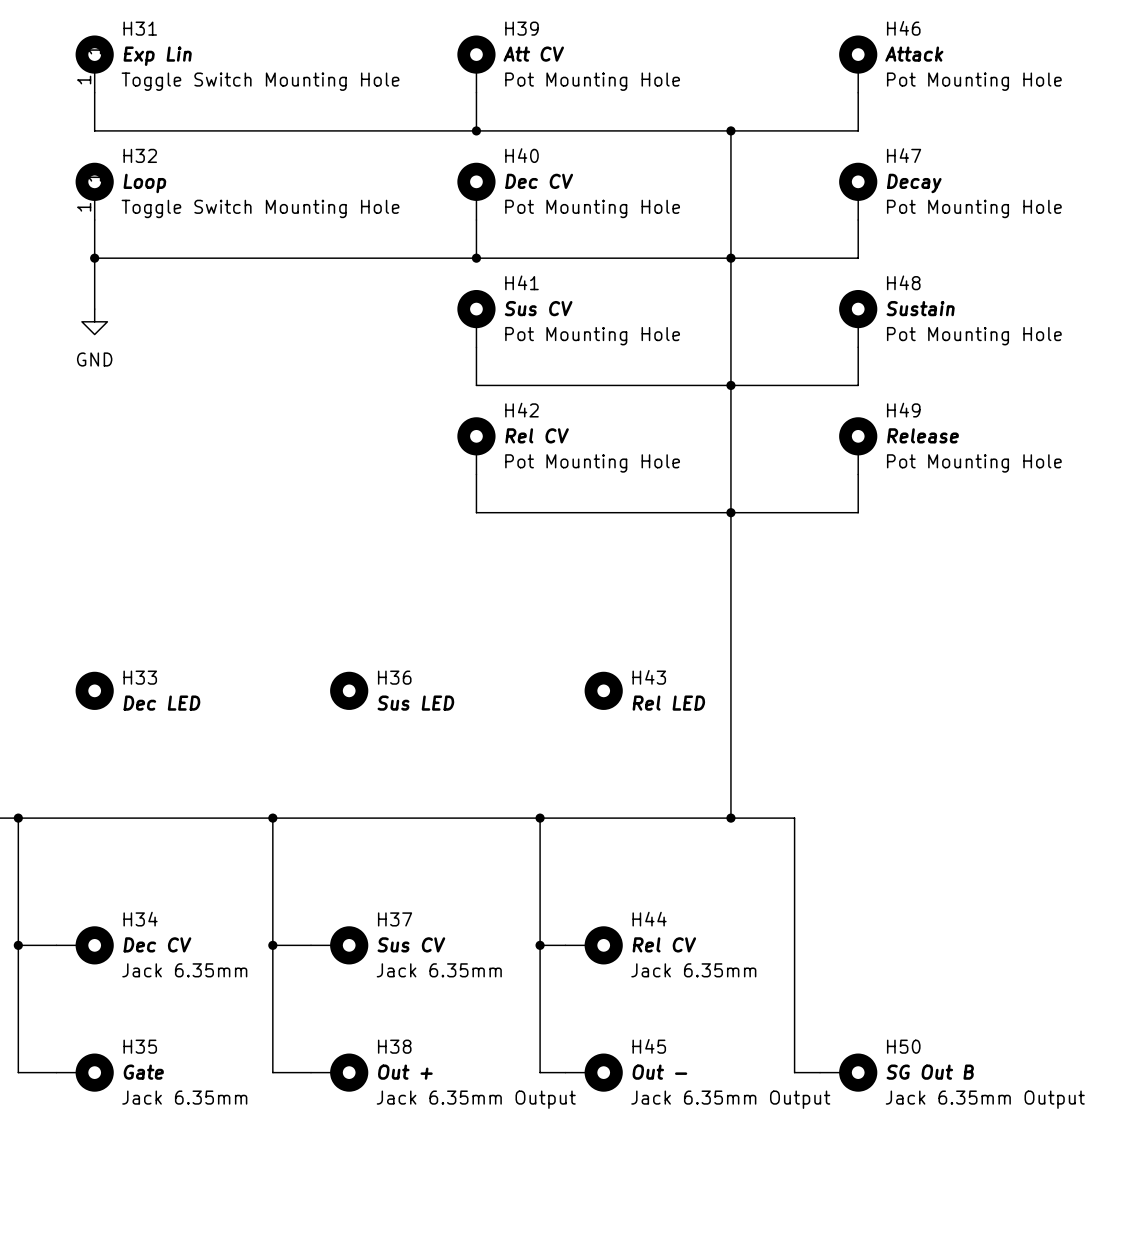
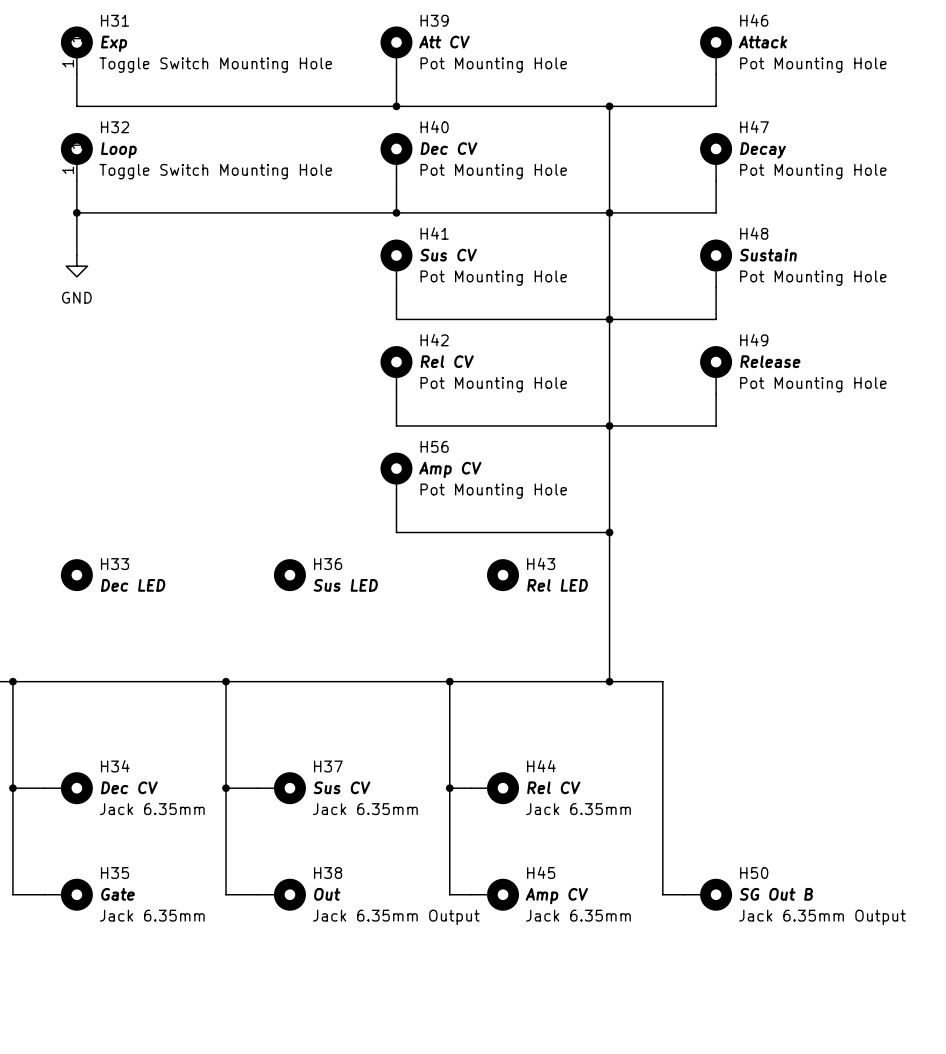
H31 value: Exp Lin (157, 56) -> Exp (114, 43)
H56: none -> Amp CV (396, 476)
wire: none -> (396, 500) (396, 532) (609, 532)
junction: none -> (609, 532)
H38 value: Out + (405, 1072) -> Out (327, 894)
H45 value: Out - (659, 1072) -> Amp CV (556, 896)
H45 text: Jack 6.35mm Output (730, 1099) -> Jack 6.35mm (578, 915)

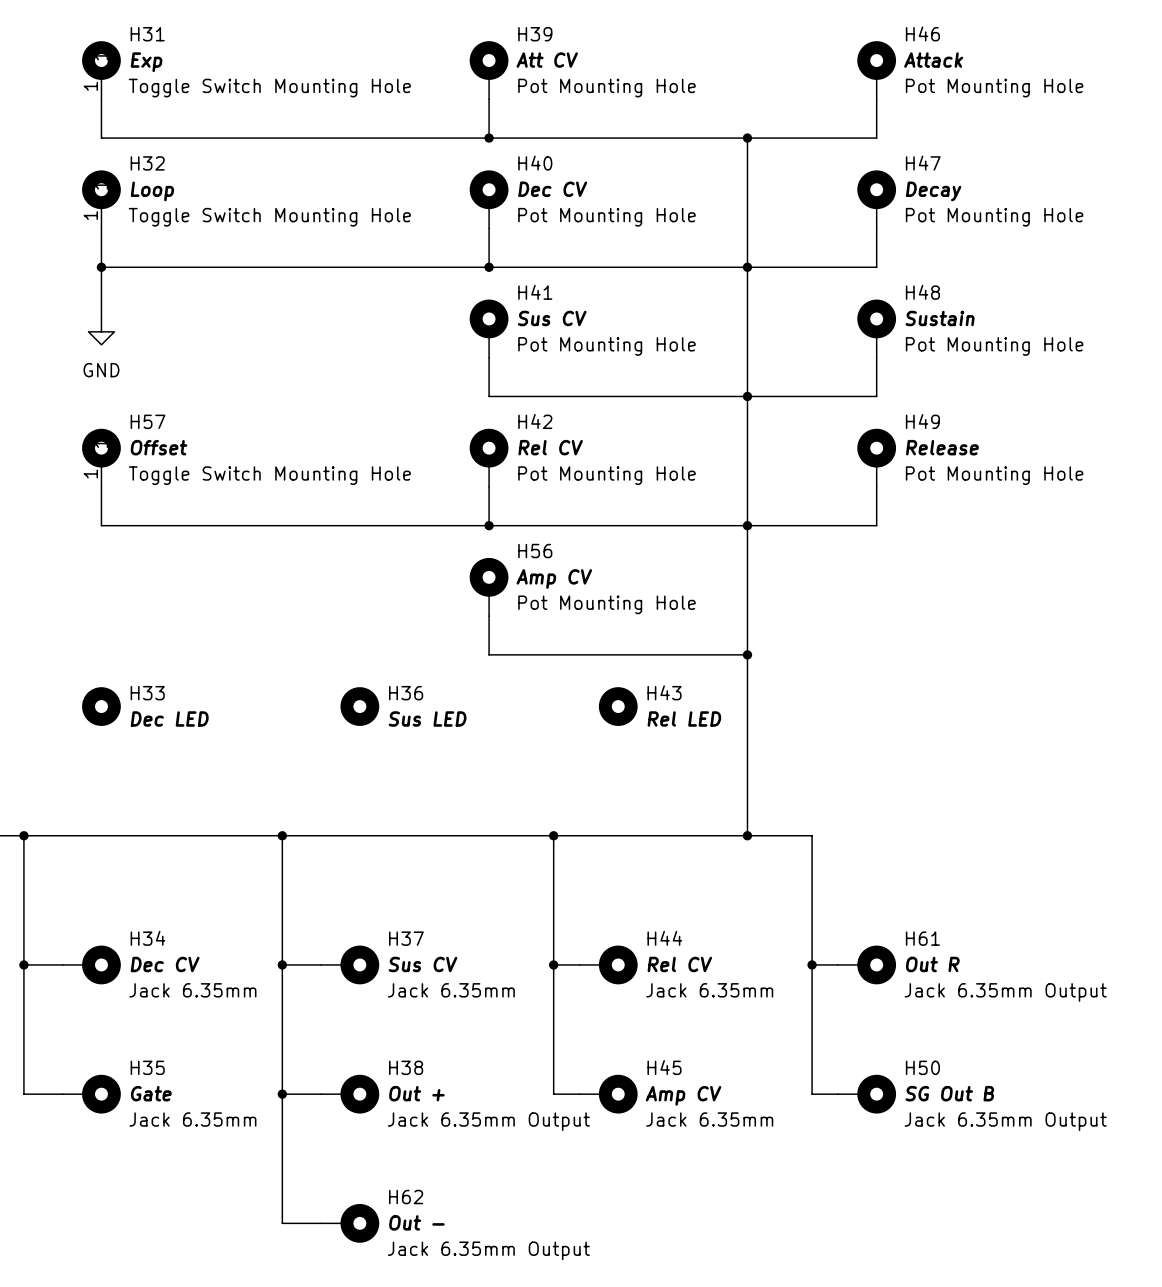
H57: none -> Offset (101, 457)
wire: none -> (101, 486) (101, 525) (489, 525)
junction: none -> (489, 525)
wire: none -> (812, 964) (837, 964)
junction: none -> (812, 964)
H61: none -> Out R (866, 964)
wire: none -> (282, 1094) (282, 1223) (321, 1223)
junction: none -> (282, 1094)
H38 value: Out (327, 894) -> Out + (416, 1093)
H62: none -> Out - (350, 1223)

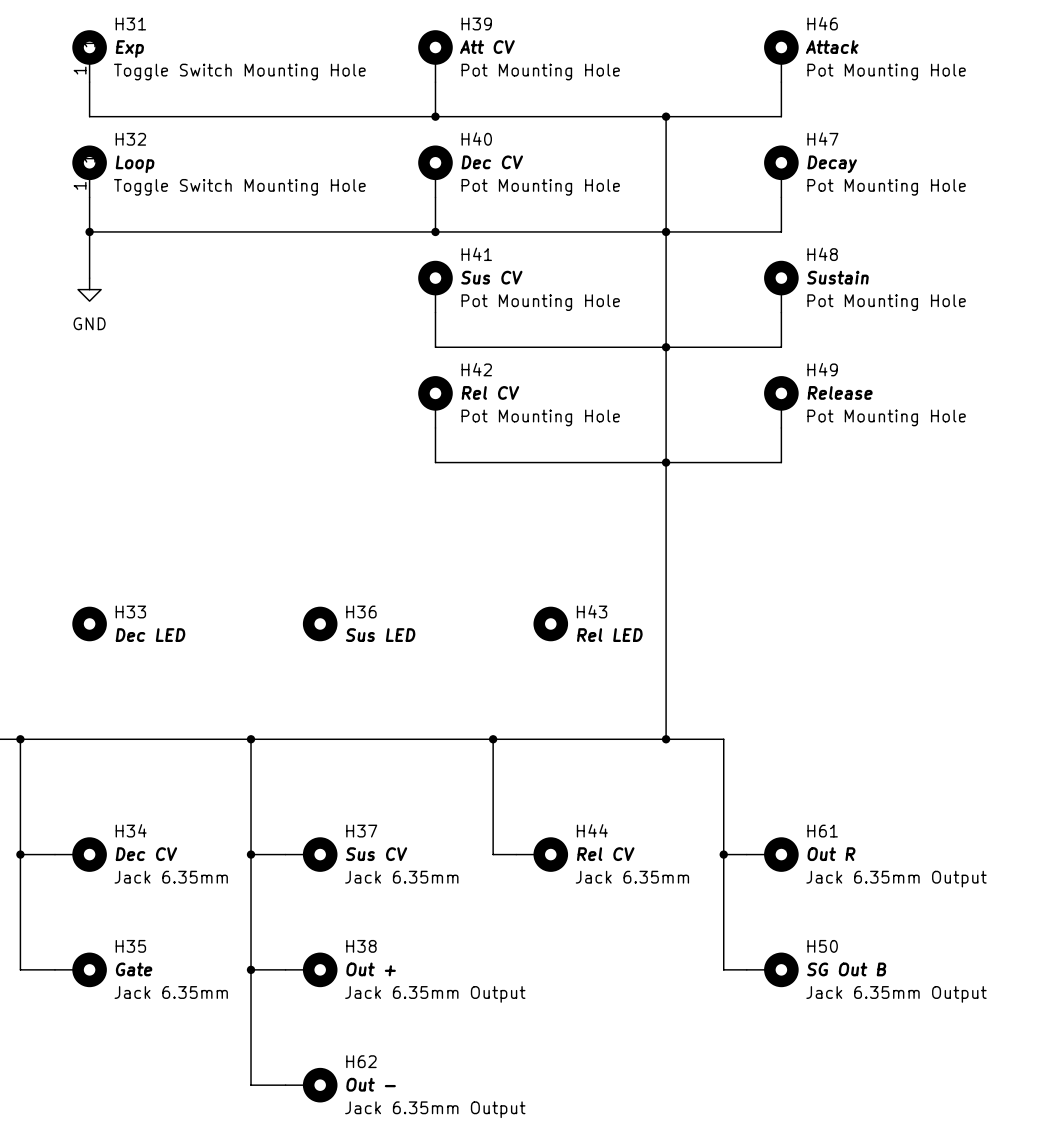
H57: Offset (101, 457) -> none
wire: (101, 486) (101, 525) (489, 525) -> none
junction: (489, 525) -> none
H56: Amp CV (489, 587) -> none
wire: (489, 616) (489, 654) (747, 654) -> none
junction: (747, 654) -> none
wire: (553, 964) (553, 1094) (579, 1094) -> none
junction: (553, 964) -> none
H45: Amp CV (608, 1094) -> none

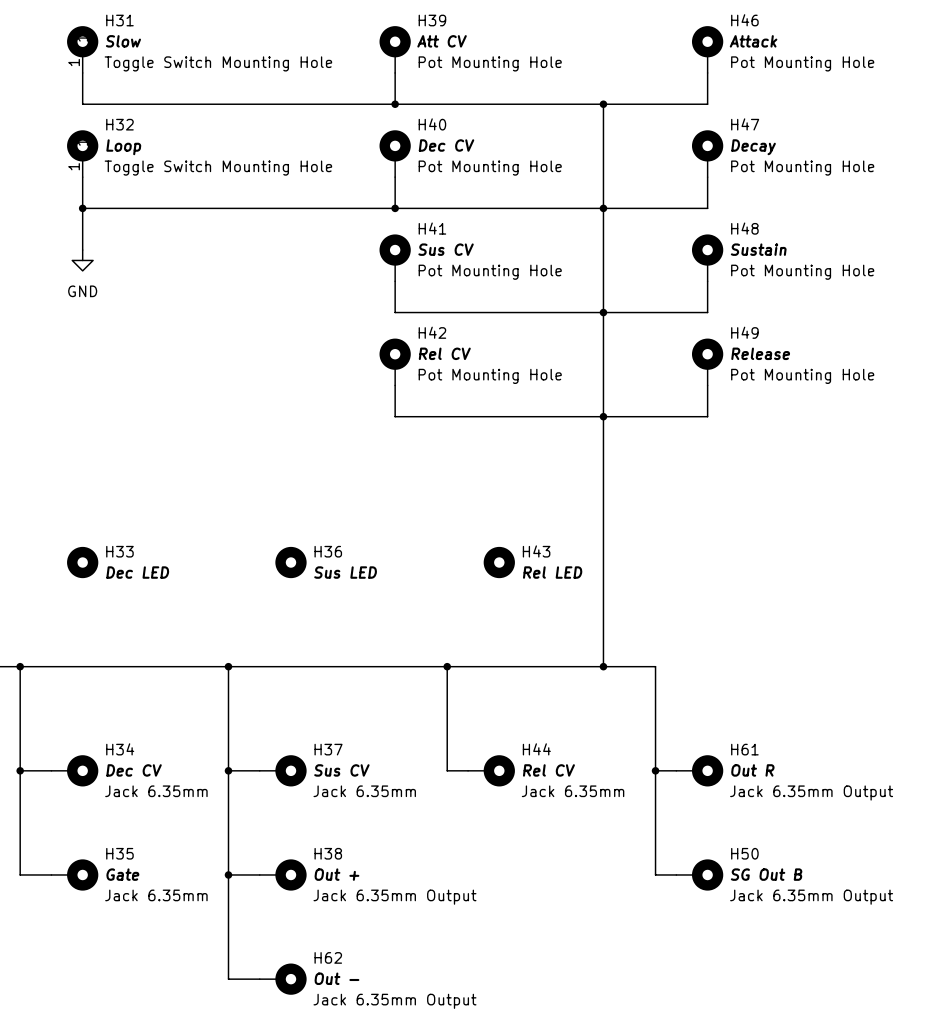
H31 value: Exp (129, 48) -> Slow (123, 41)

